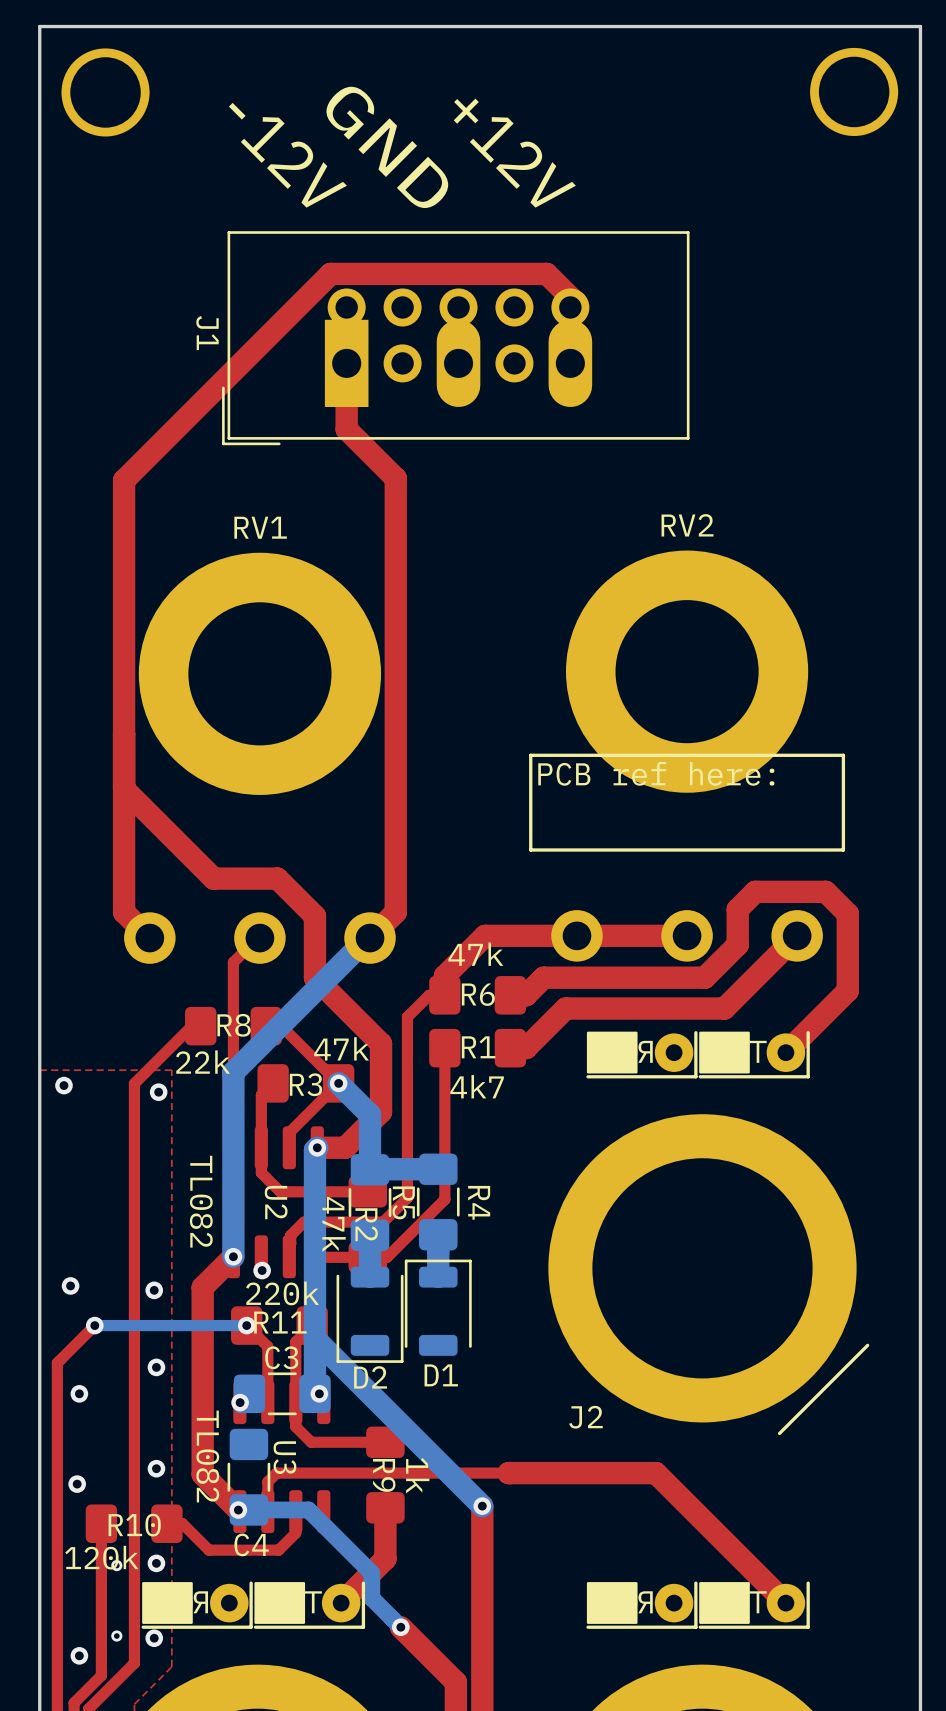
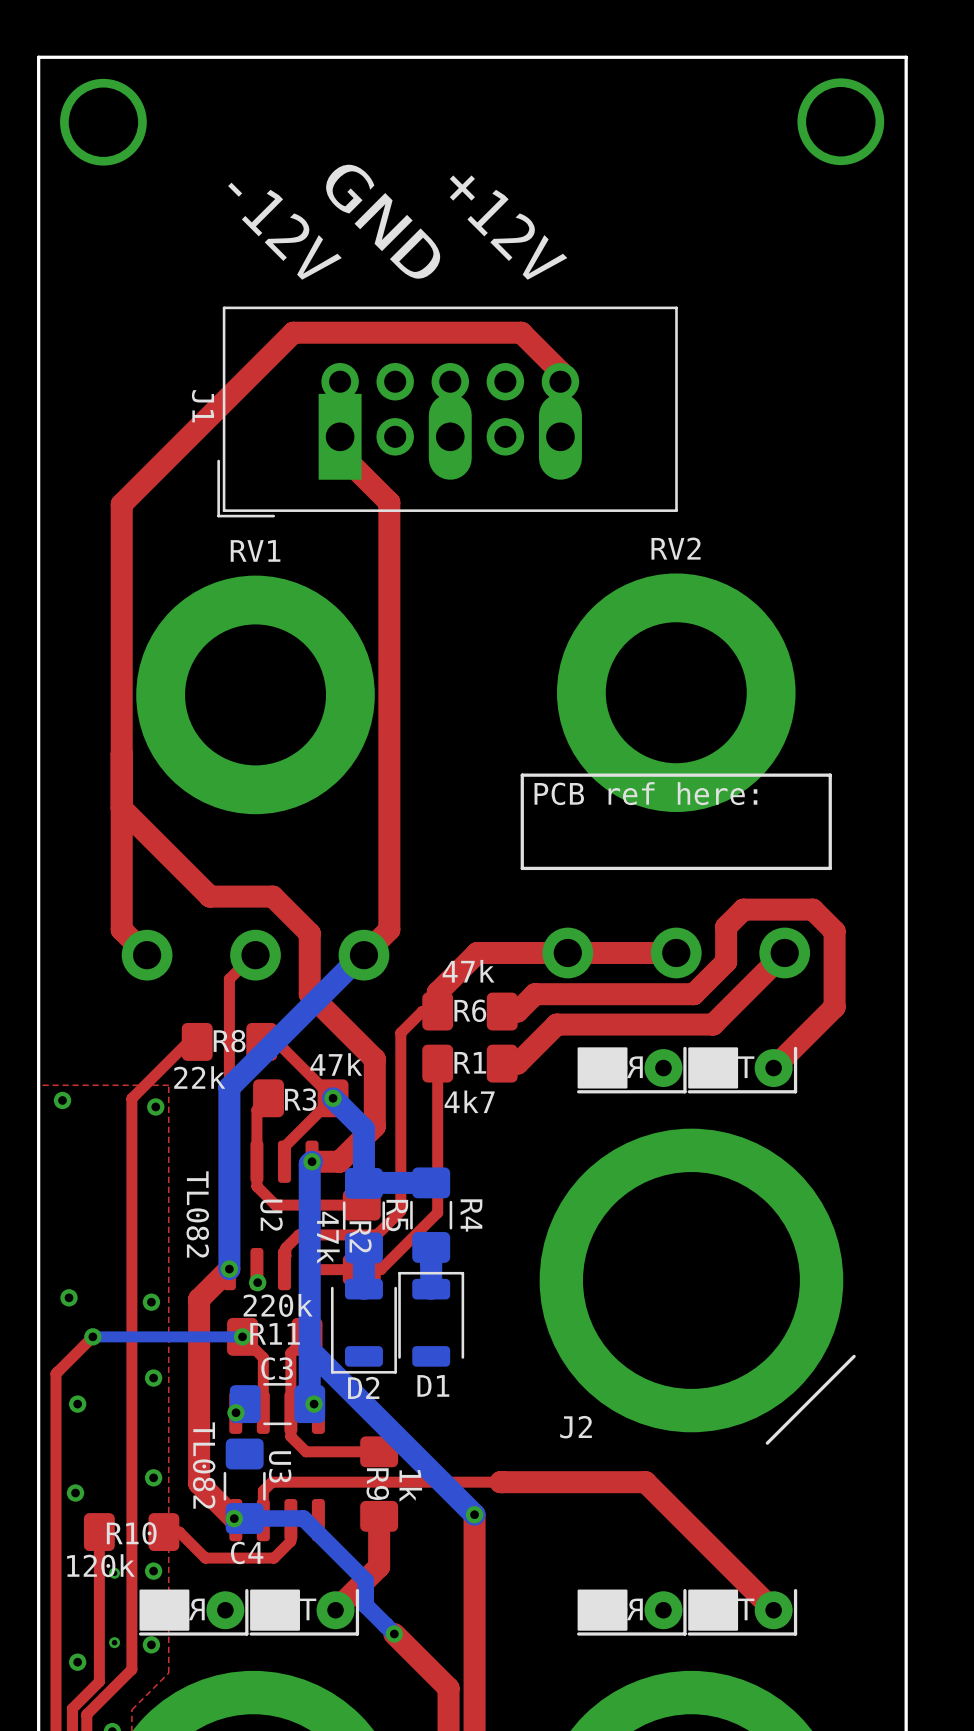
text position: GND (387, 147) -> GND (383, 221)
text position: +12V (514, 153) -> +12V (508, 227)
text position: -12V (287, 155) -> -12V (284, 231)
top track: (298, 306) (330, 273) (546, 273) (570, 297) (570, 363) -> (293, 332) (521, 332) (560, 371) (560, 436)
J1 position: (455, 338) -> (447, 411)

